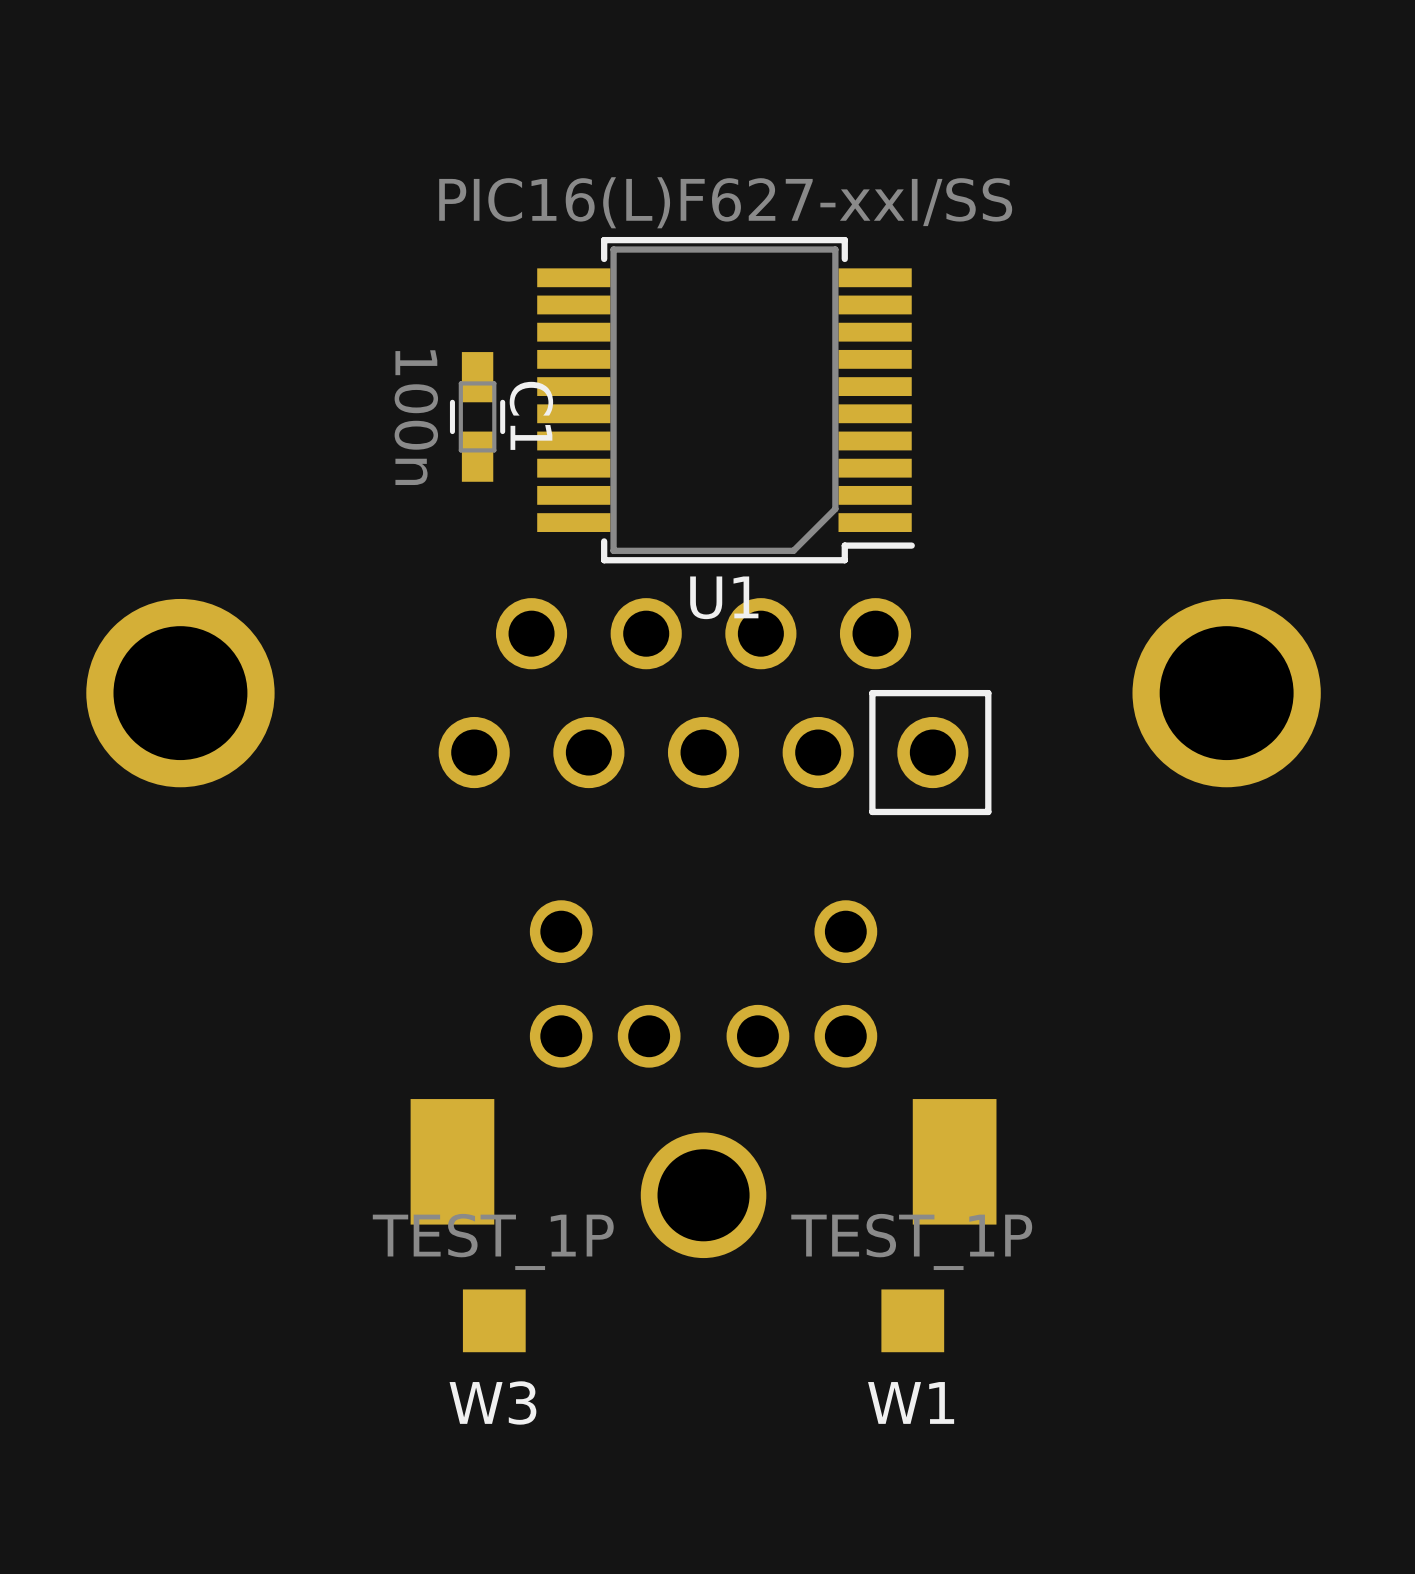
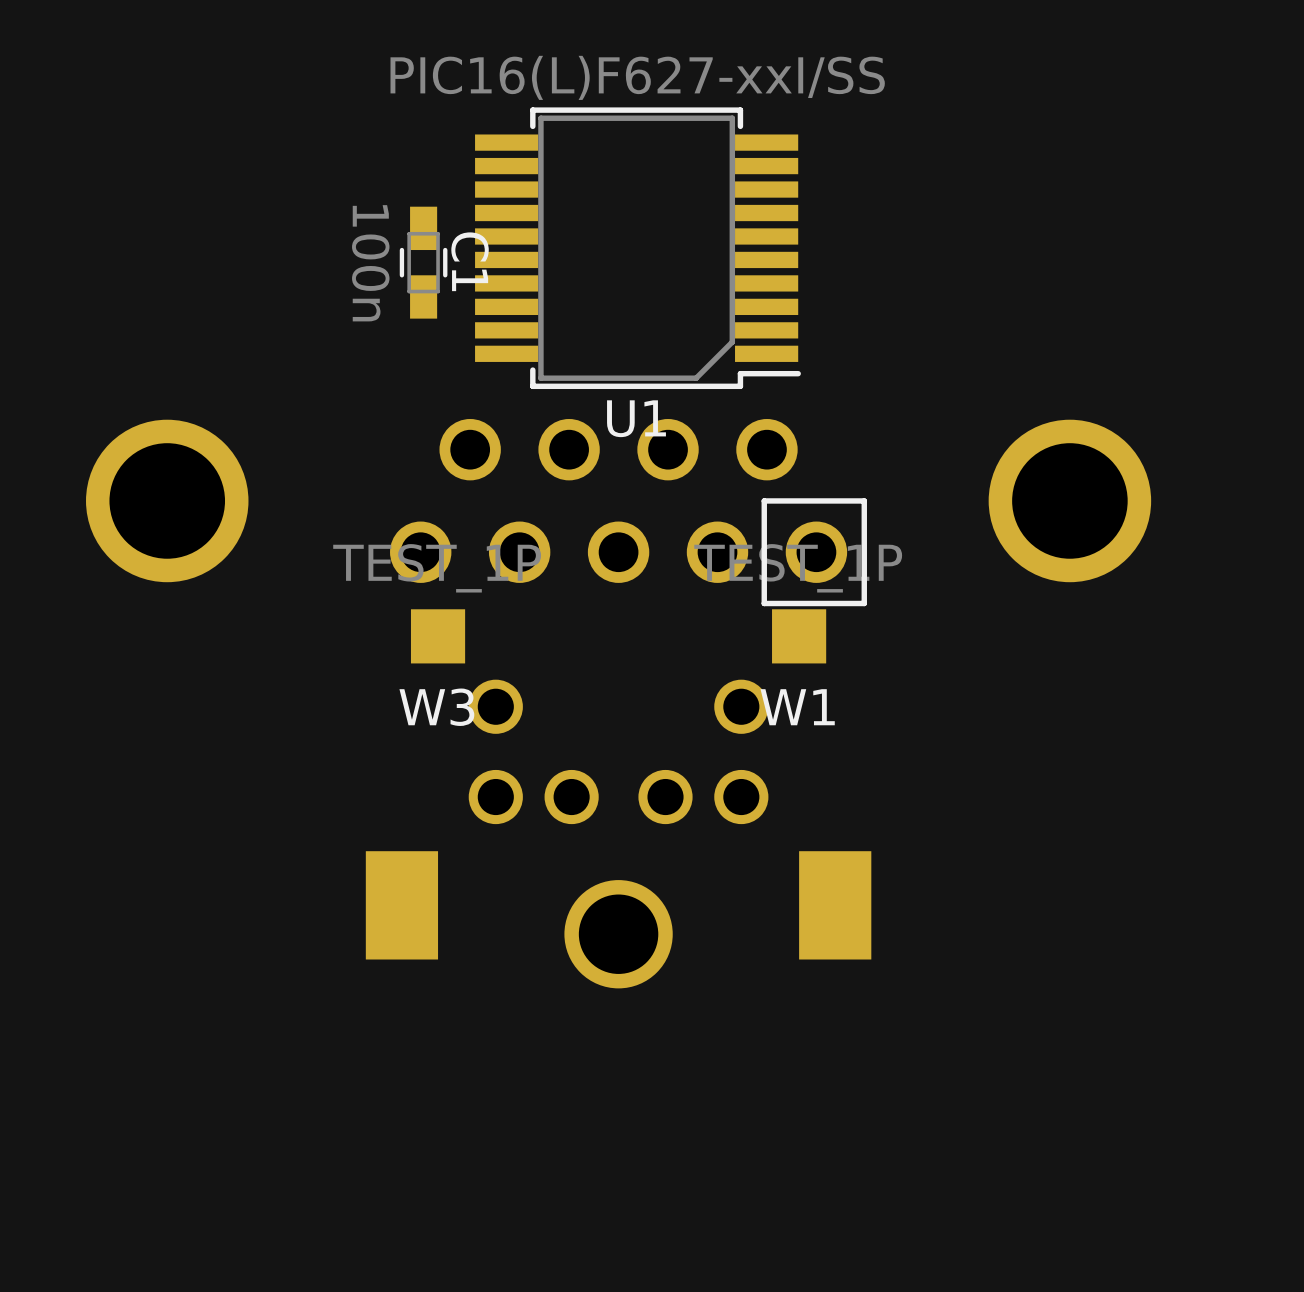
W3 position: (494, 1320) -> (438, 636)
W1 position: (912, 1320) -> (799, 636)

